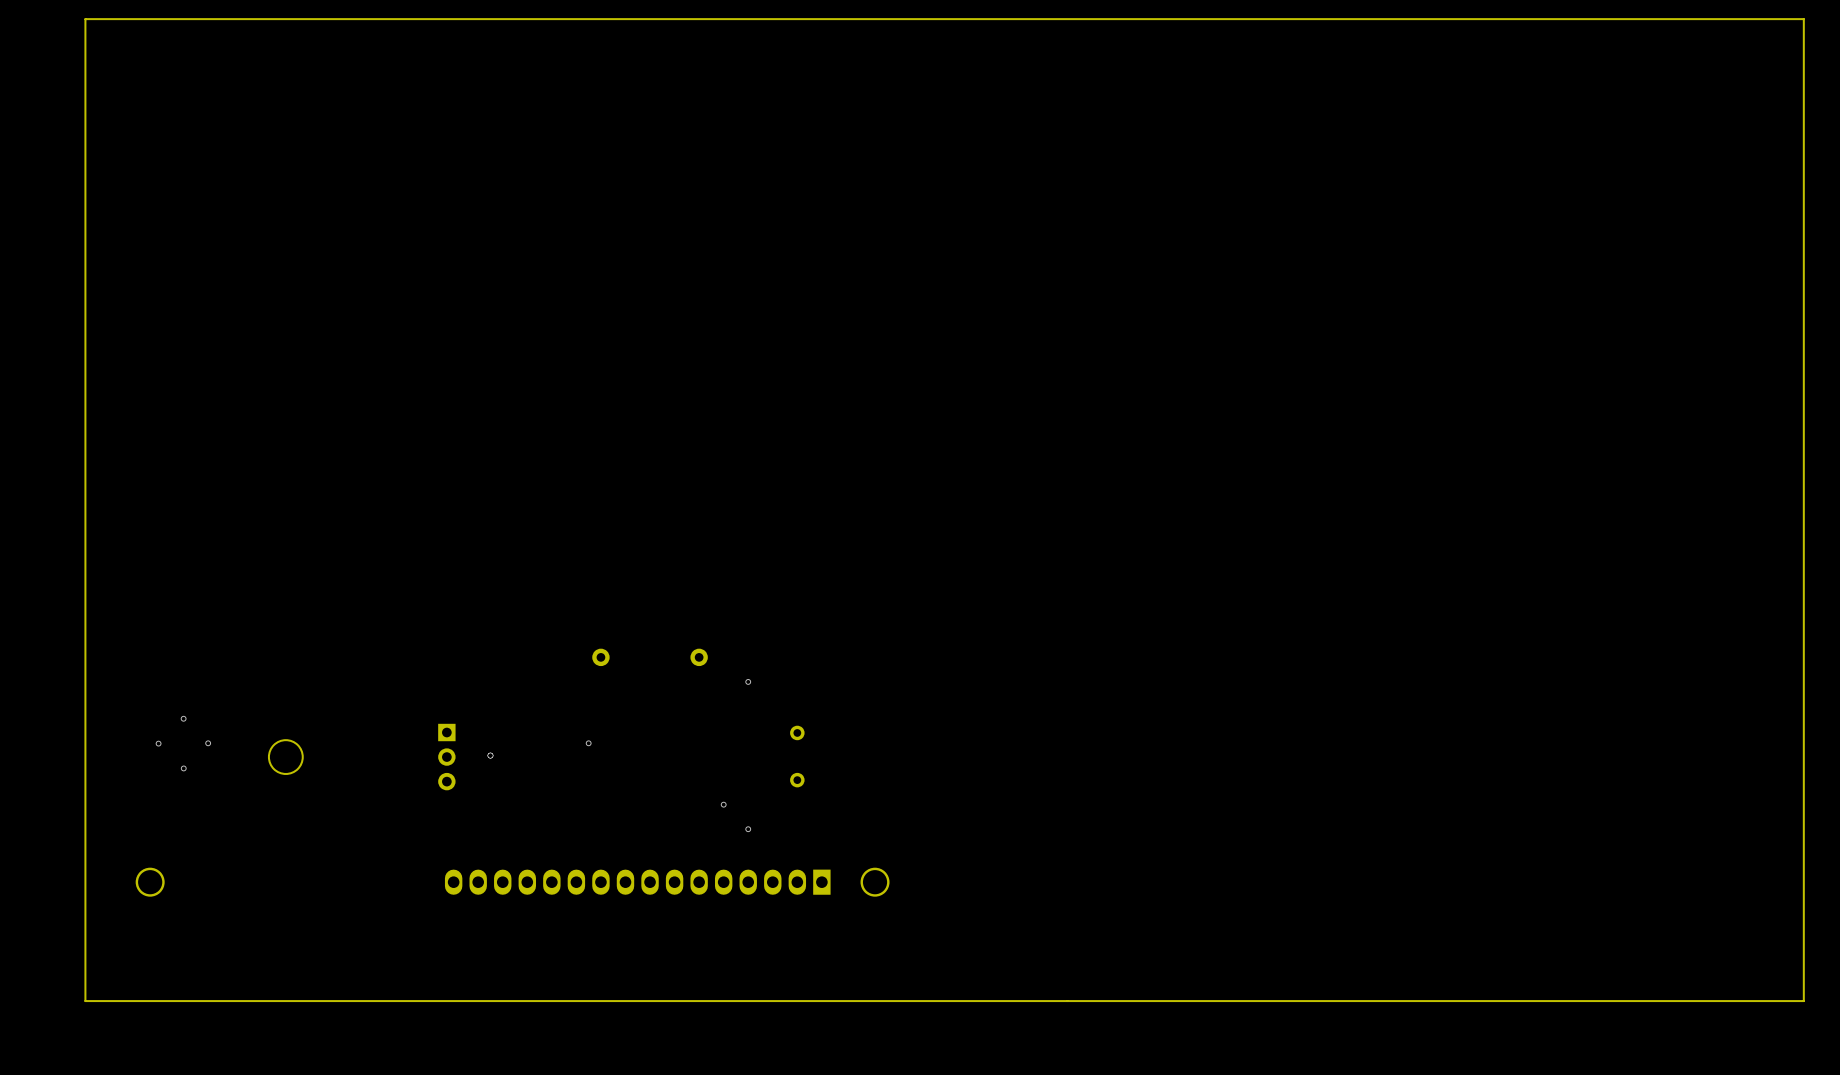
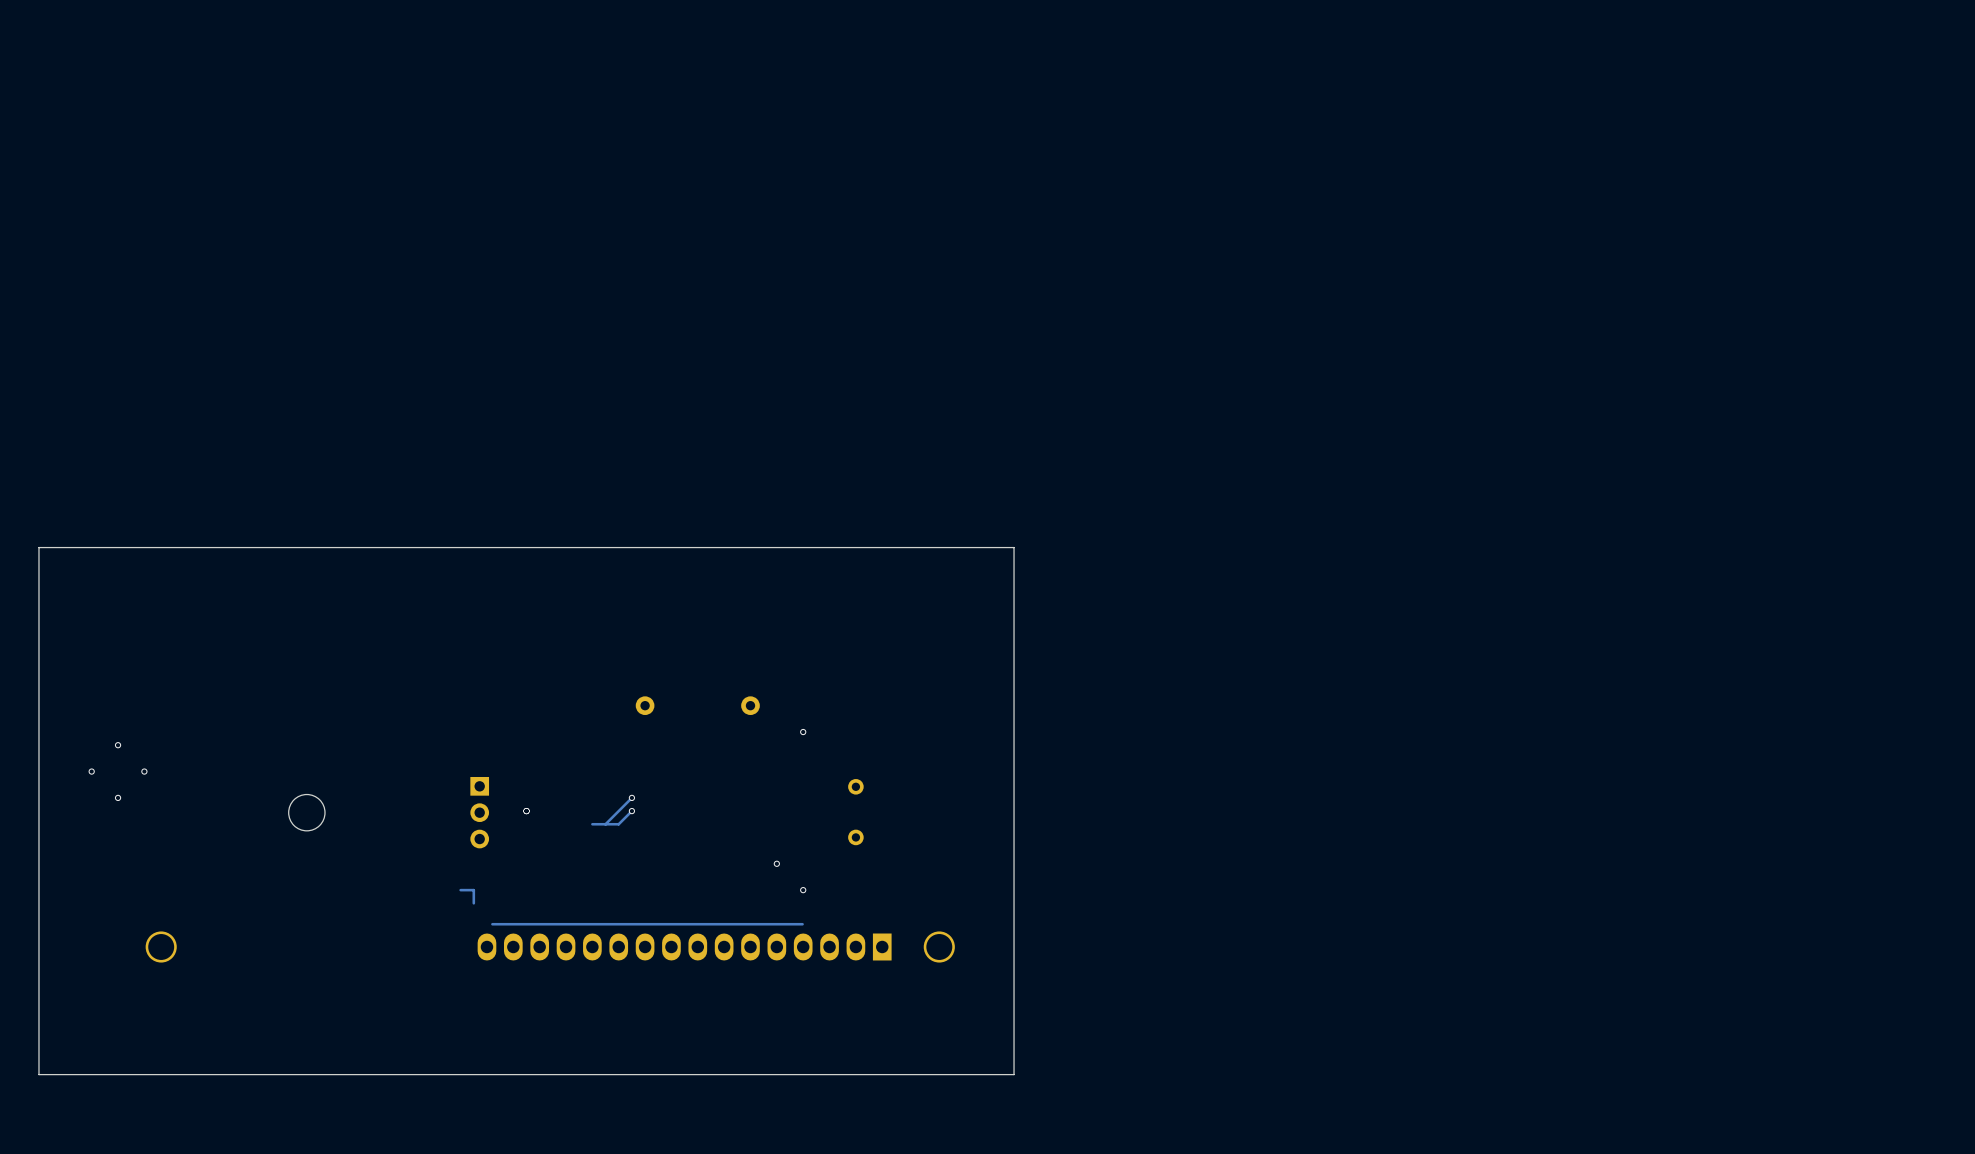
via: none -> (118, 745)
via: none -> (91, 771)
via: none -> (144, 771)
via: (183, 718) -> none
via: none -> (118, 797)
via: (158, 743) -> none
via: (208, 743) -> none
track: none -> (631, 797) (605, 824)
track: none -> (631, 811) (618, 824) (592, 824)
via: none -> (631, 811)
via: (183, 768) -> none
track: none -> (460, 890) (473, 890) (473, 903)
track: none -> (802, 924) (492, 924)
board edge: (944, 1001) (1803, 1001) (1803, 19) (85, 19) (85, 1001) -> (1014, 1074) (1014, 547) (38, 547) (38, 1074) (91, 1074)

